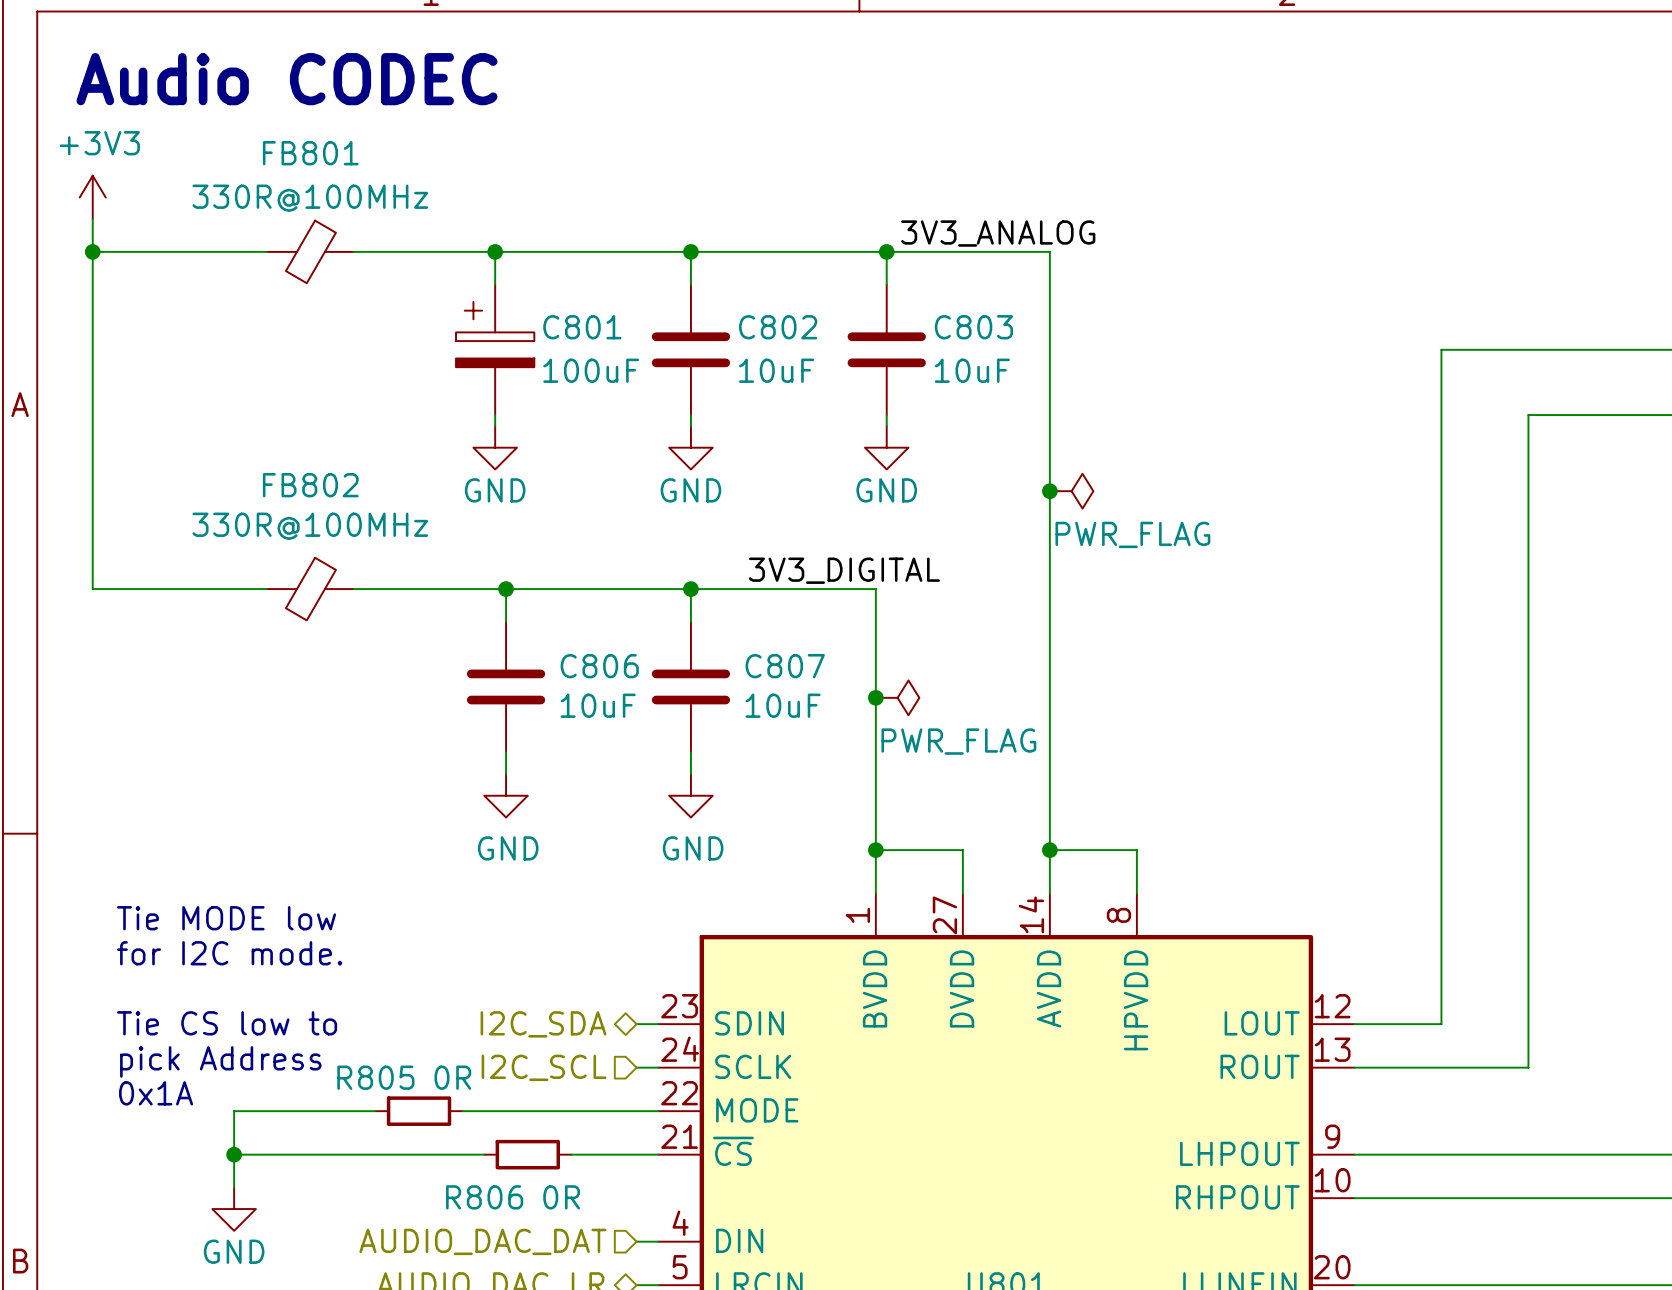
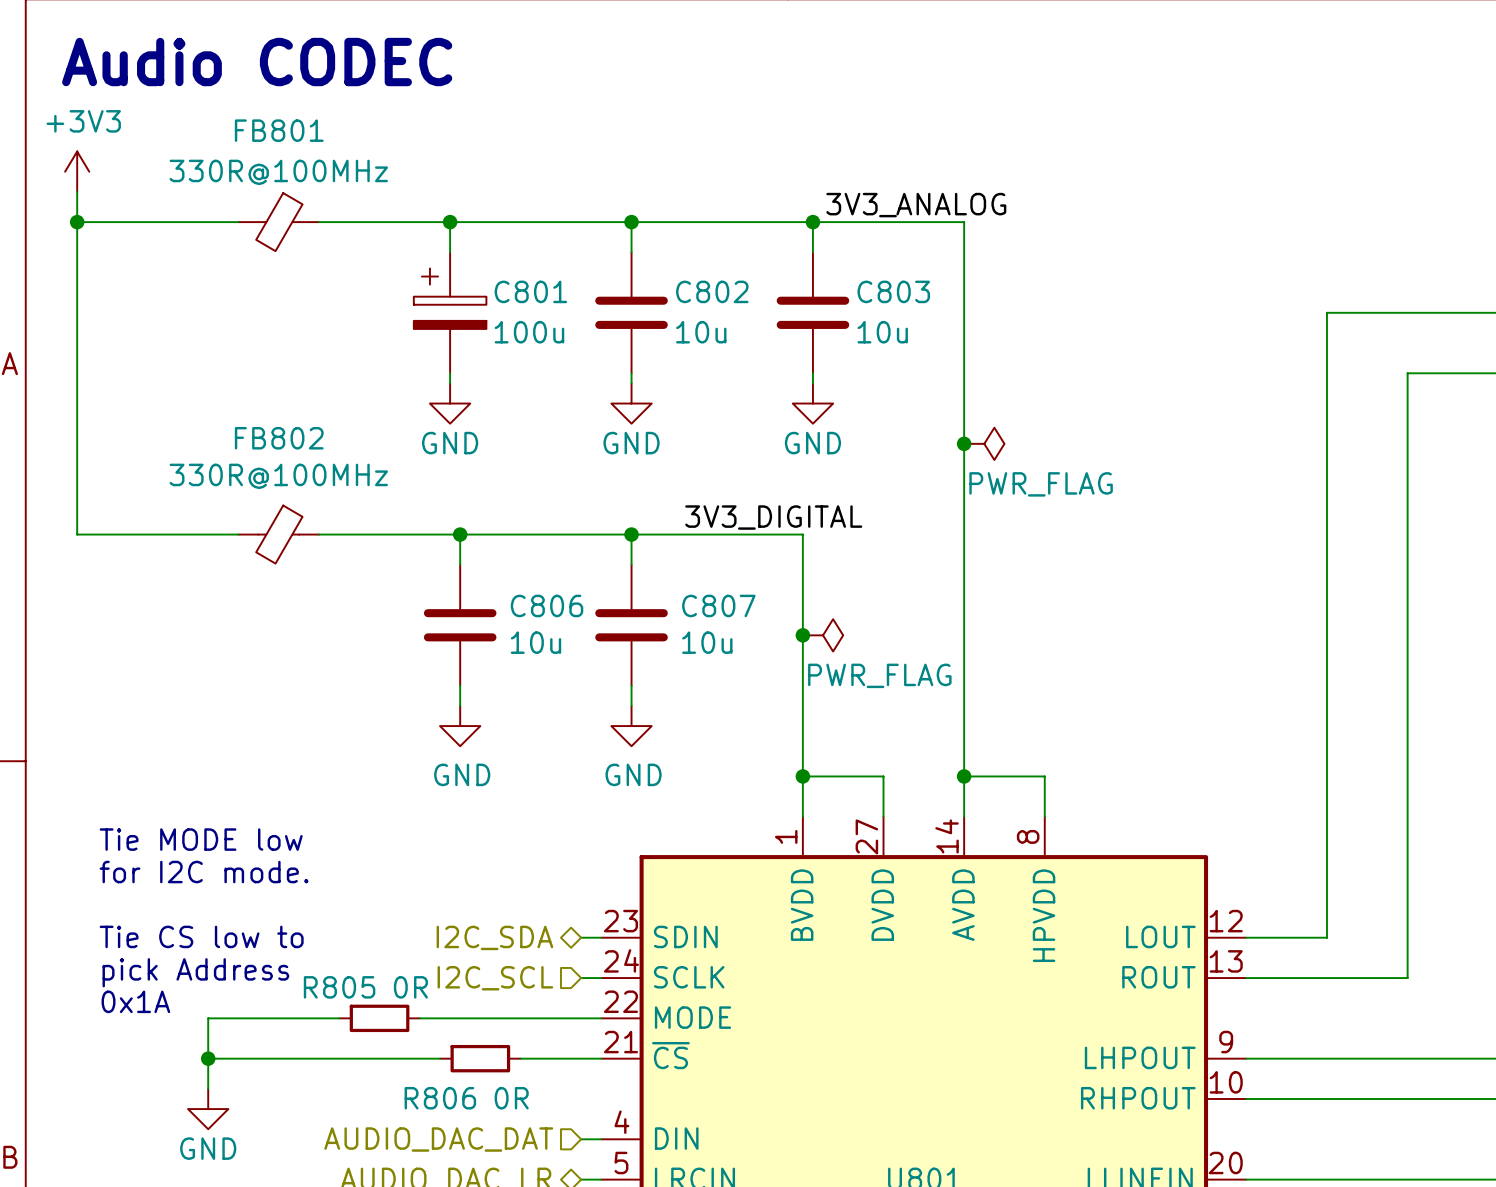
C801 value: 100uF (591, 370) -> 100u (529, 332)
C802 value: 10uF (776, 370) -> 10u (701, 332)
C803 value: 10uF (972, 370) -> 10u (882, 332)
C806 value: 10uF (598, 705) -> 10u (535, 642)
C807 value: 10uF (783, 705) -> 10u (707, 642)

